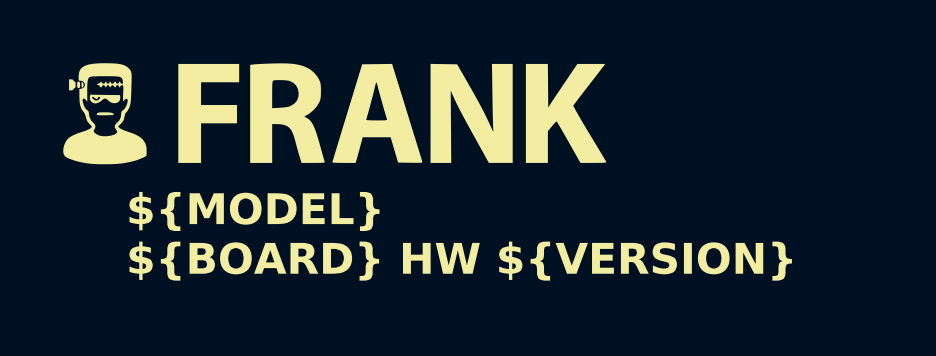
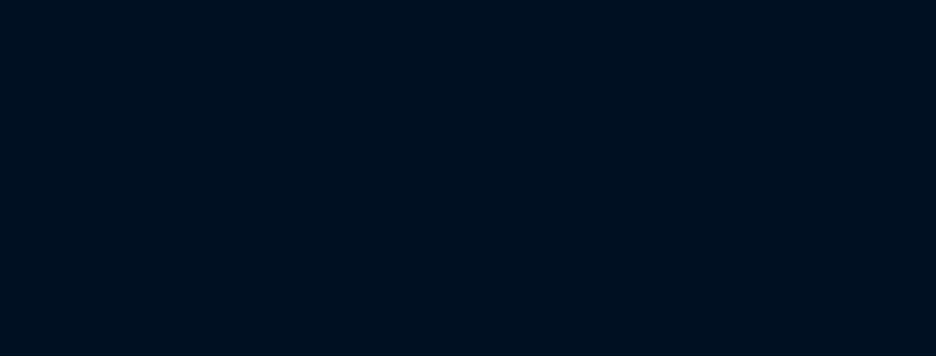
drawing: [63, 63, 607, 165] -> none
text: ${MODEL} (254, 211) -> none
text: ${BOARD} HW ${VERSION} (460, 261) -> none

